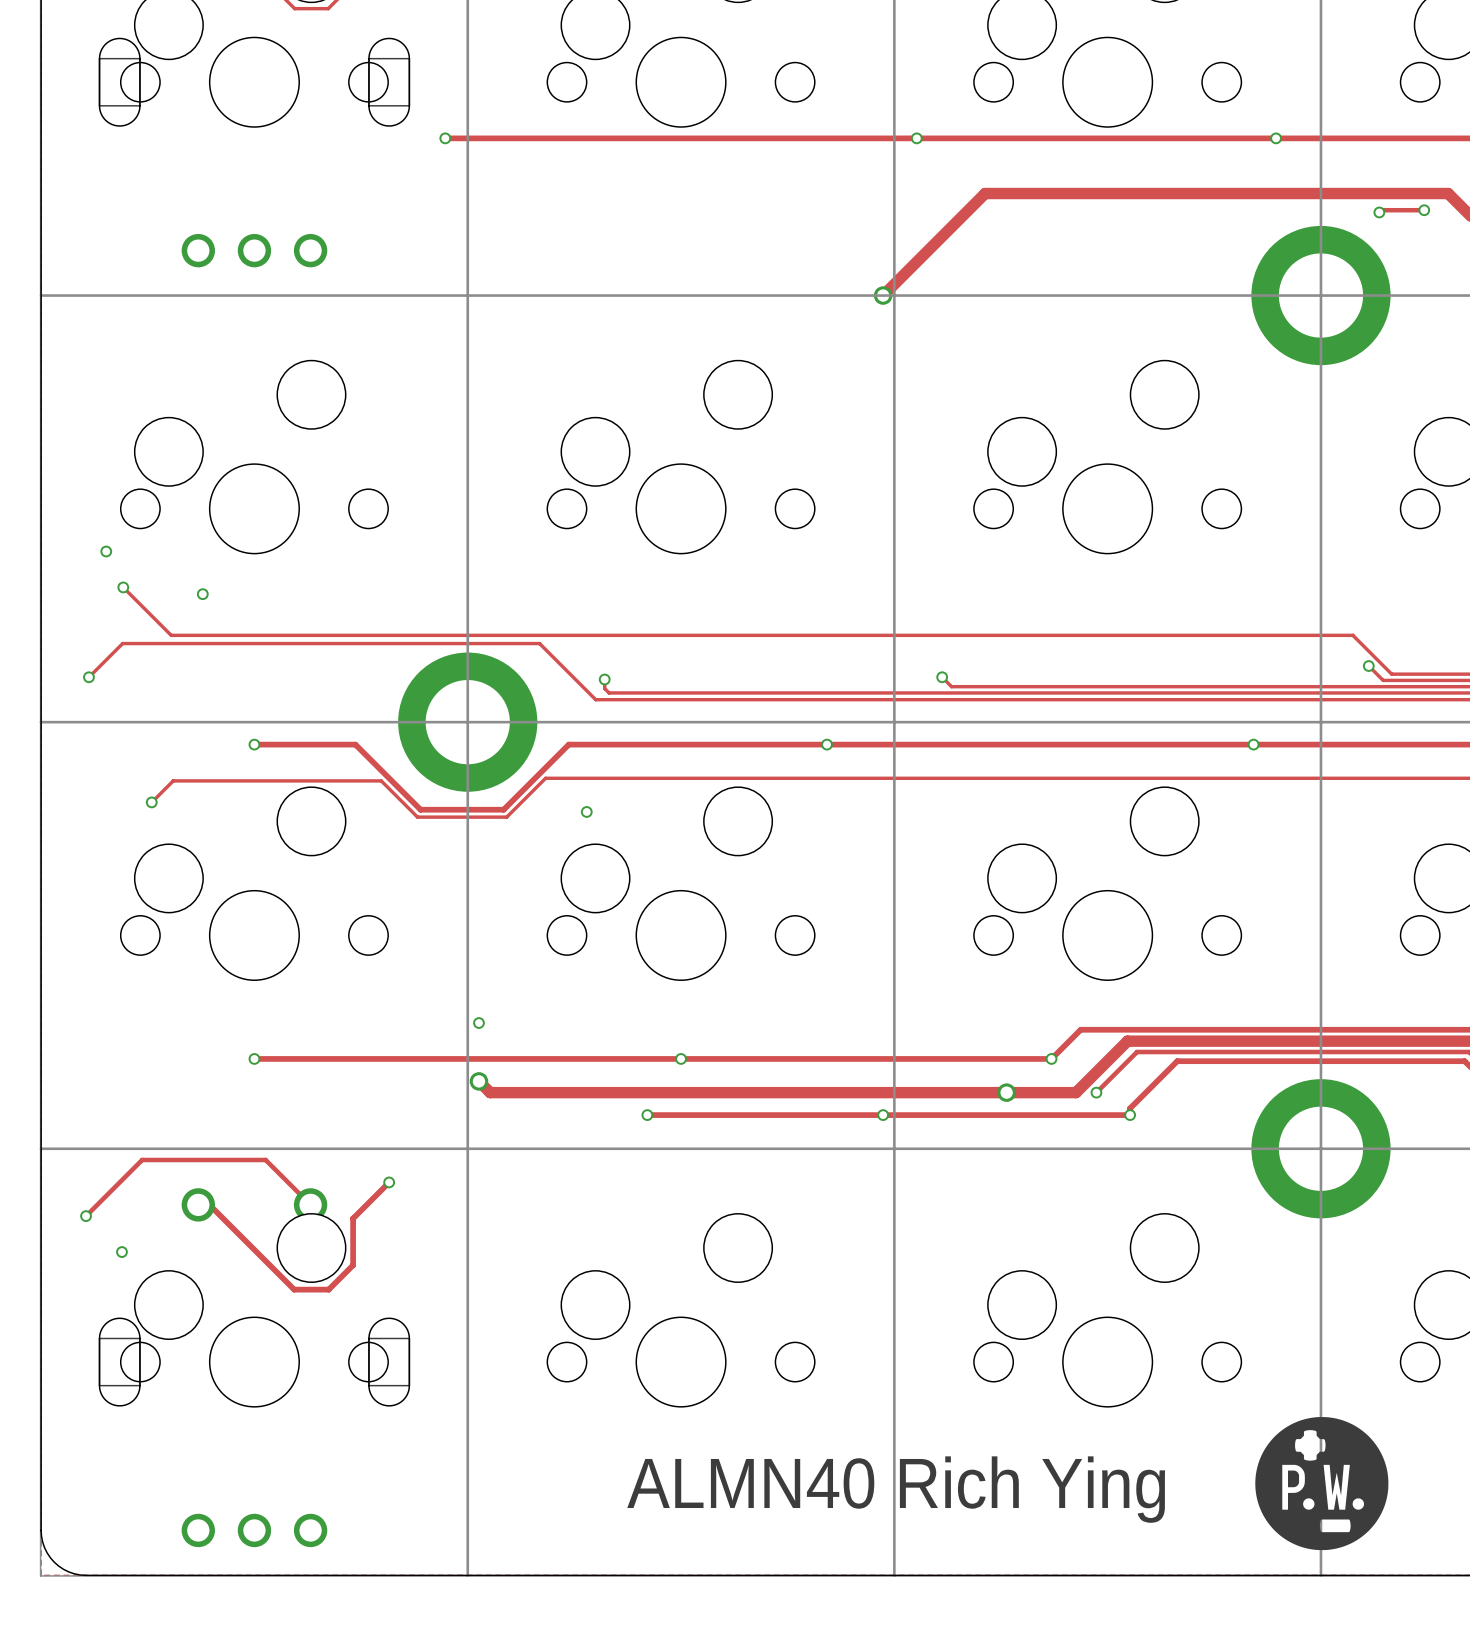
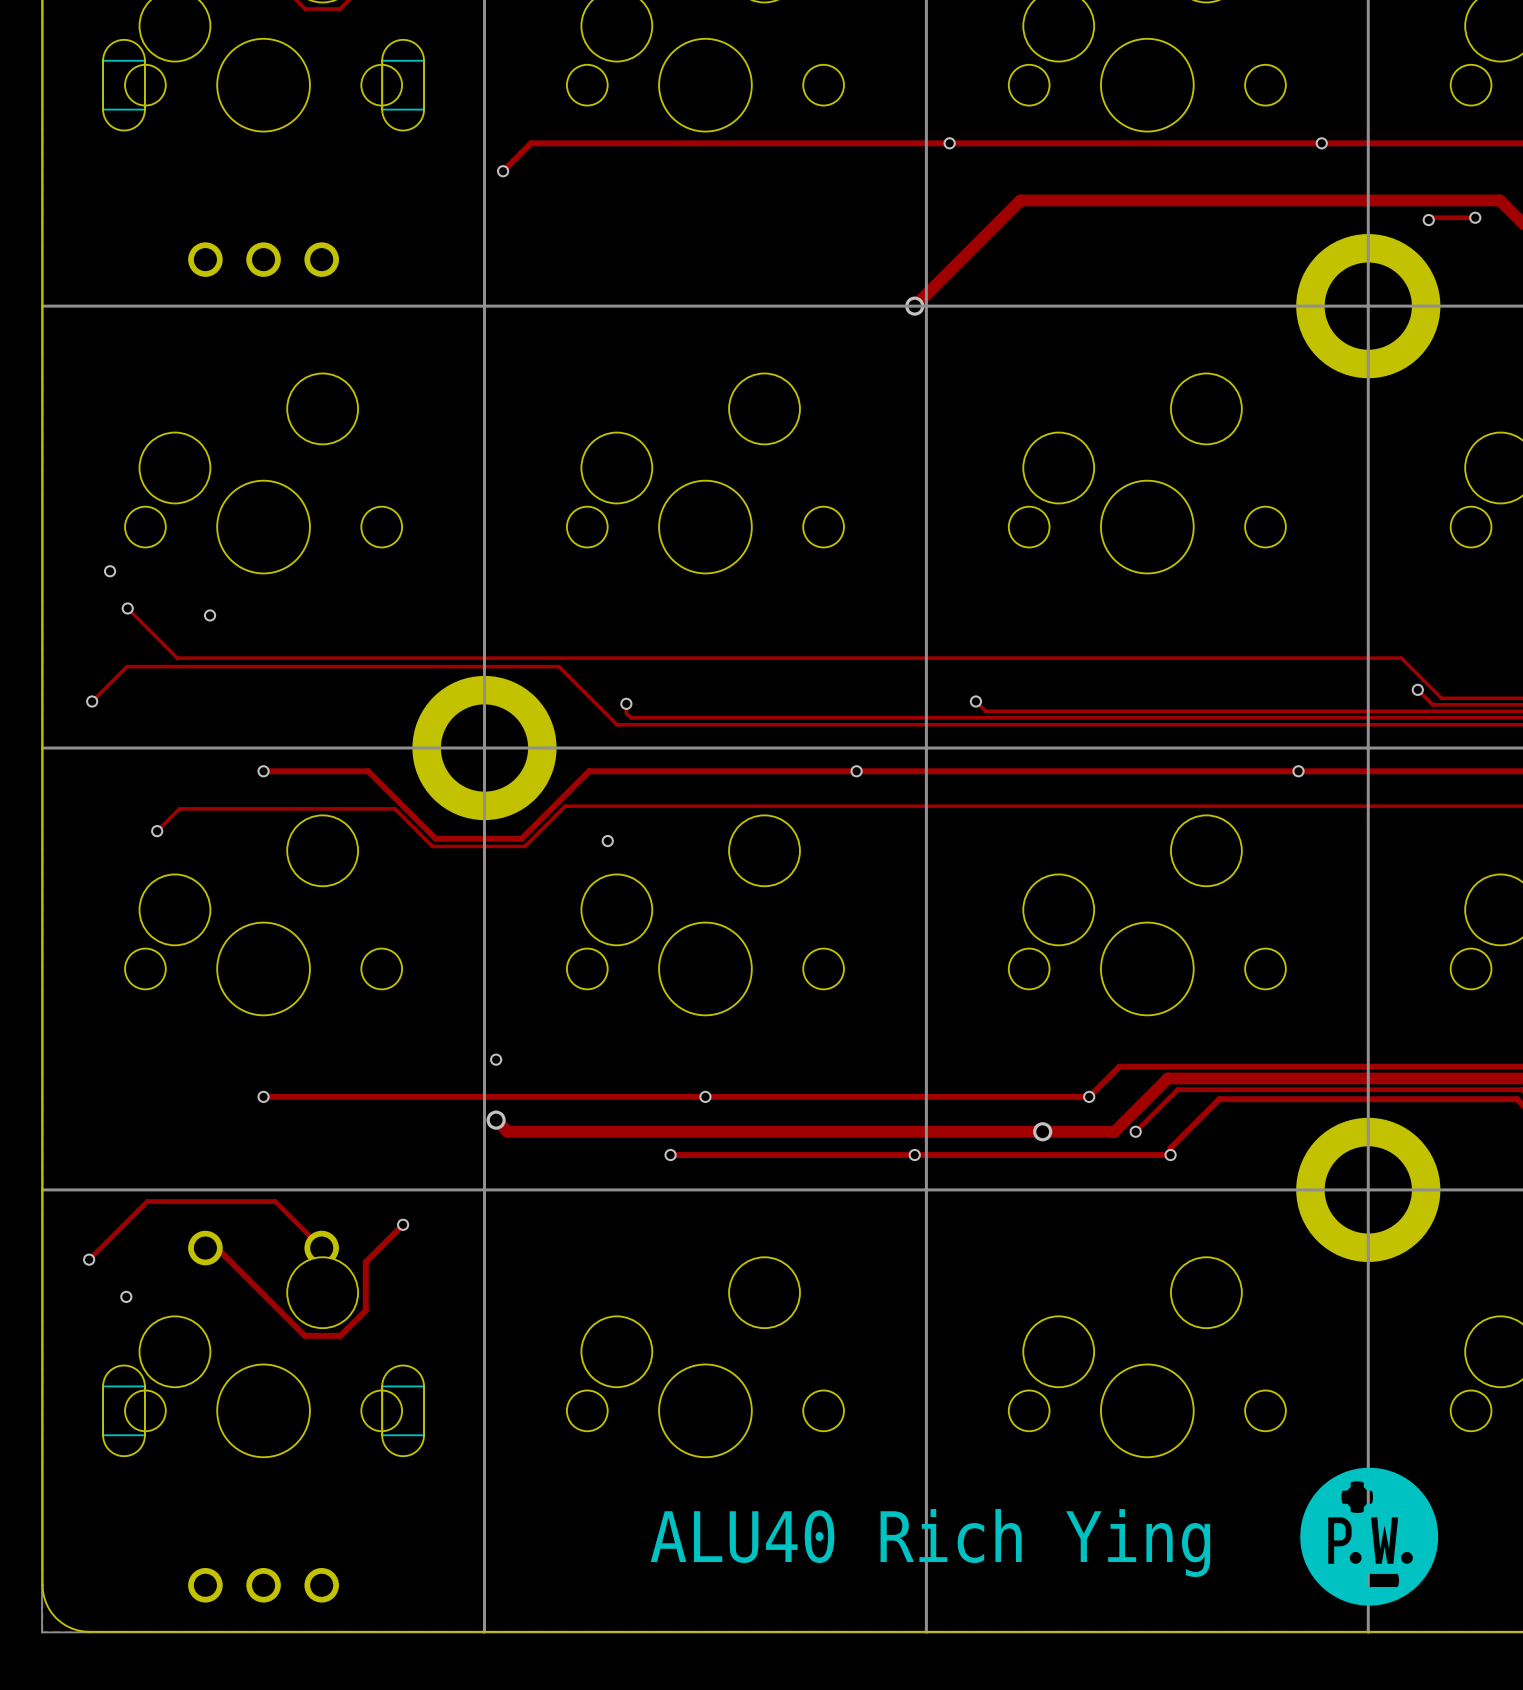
track: (445, 138) (512, 138) -> (503, 171) (531, 143)
via position: (445, 138) -> (503, 171)
text: ALMN40 Rich Ying (896, 1489) -> ALU40 Rich Ying (930, 1543)

